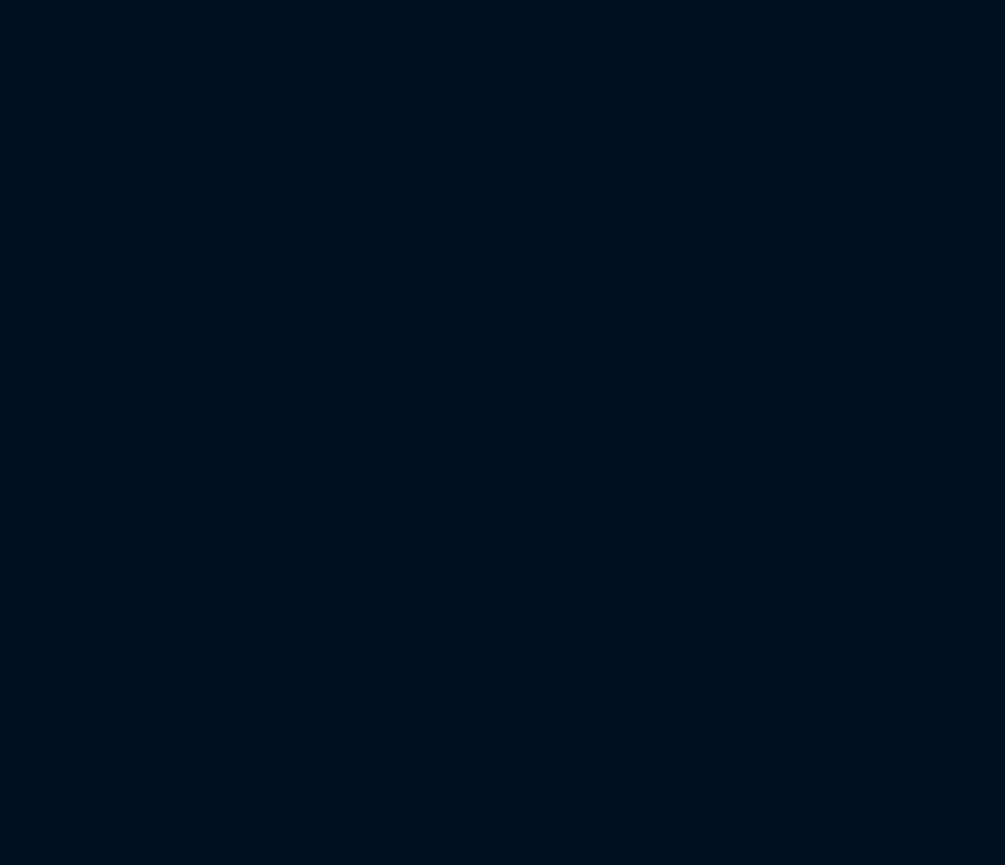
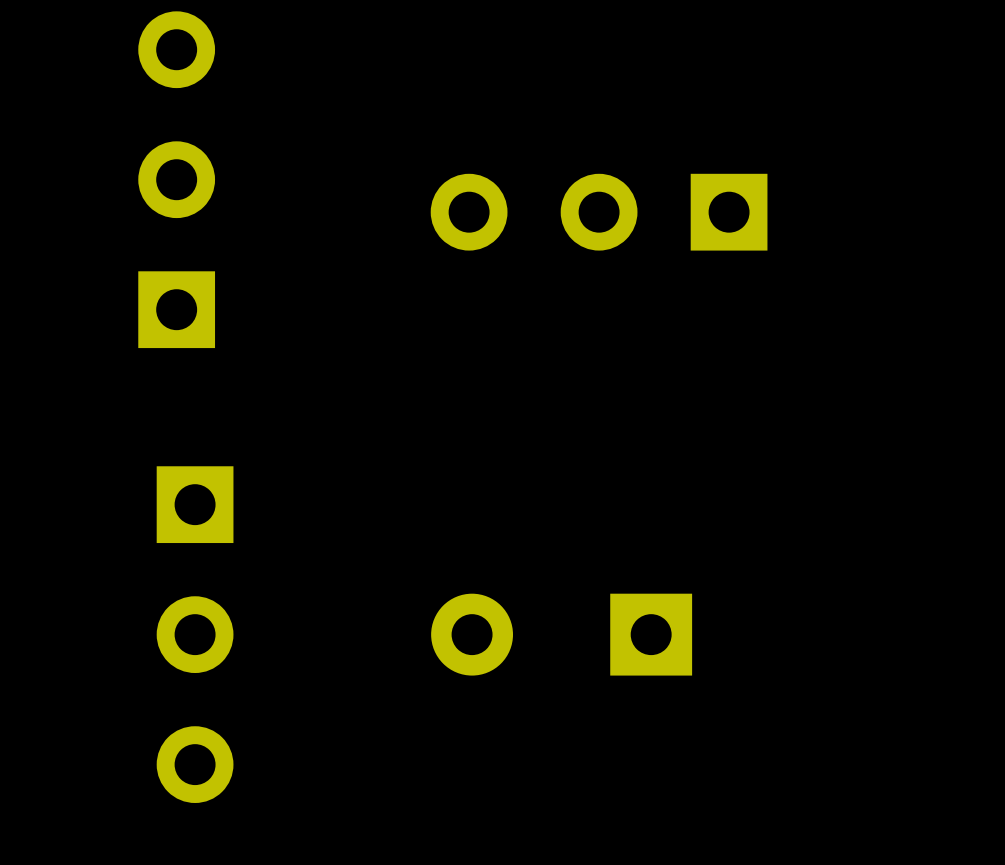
part: none -> (176, 179)
part: none -> (599, 212)
part: none -> (195, 634)
part: none -> (561, 634)

